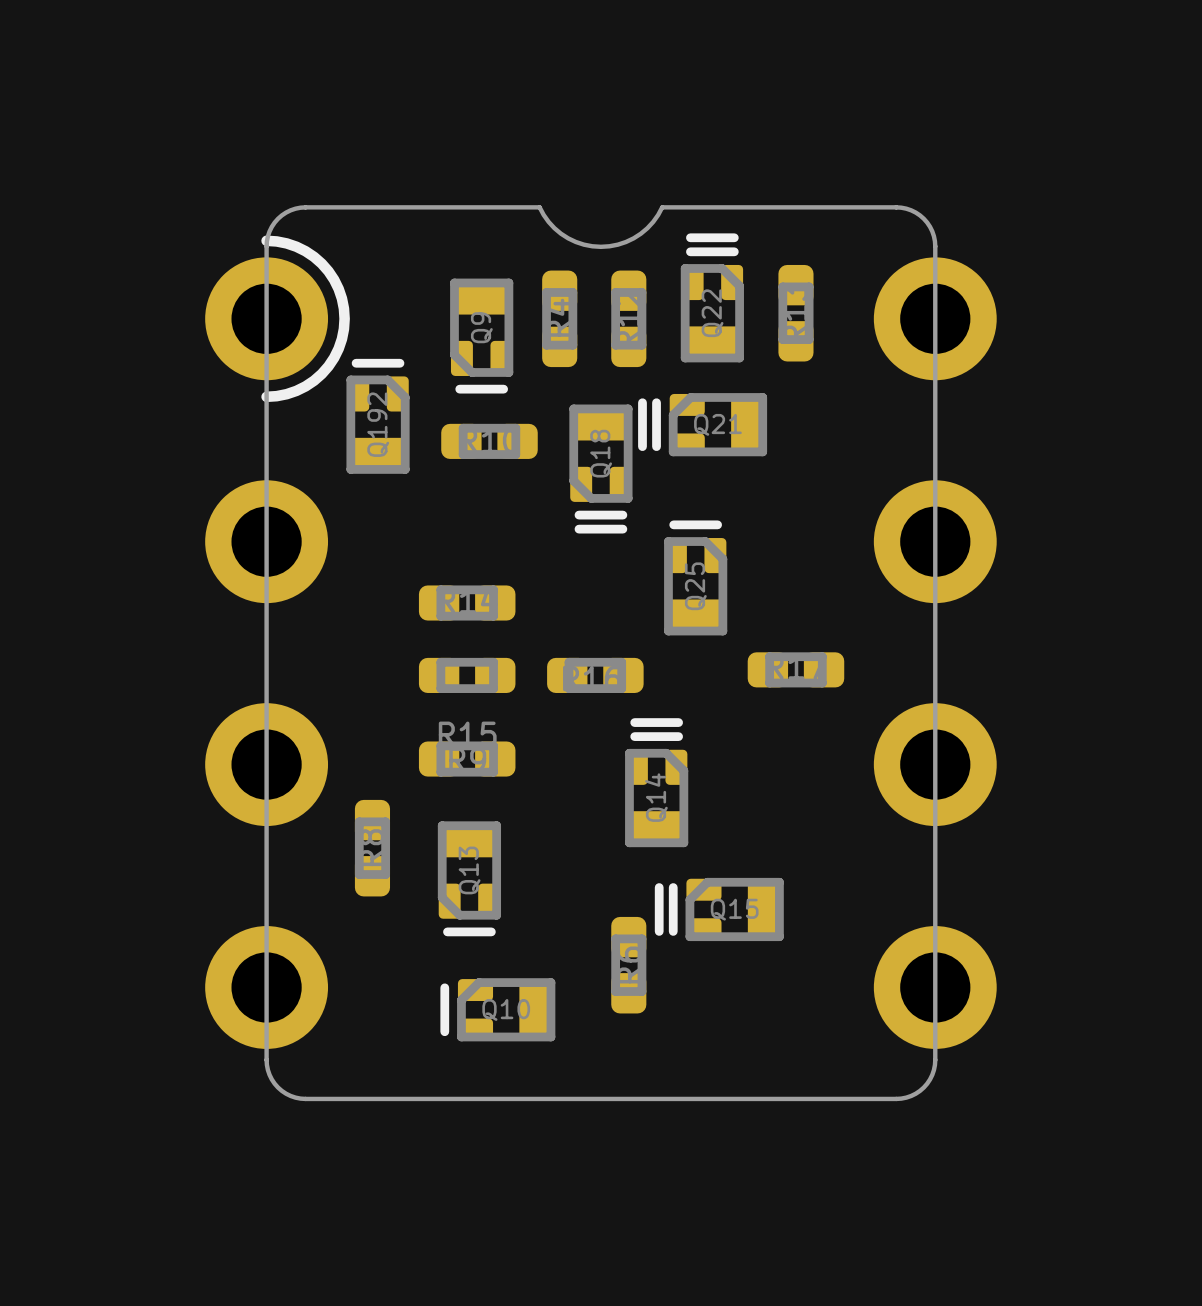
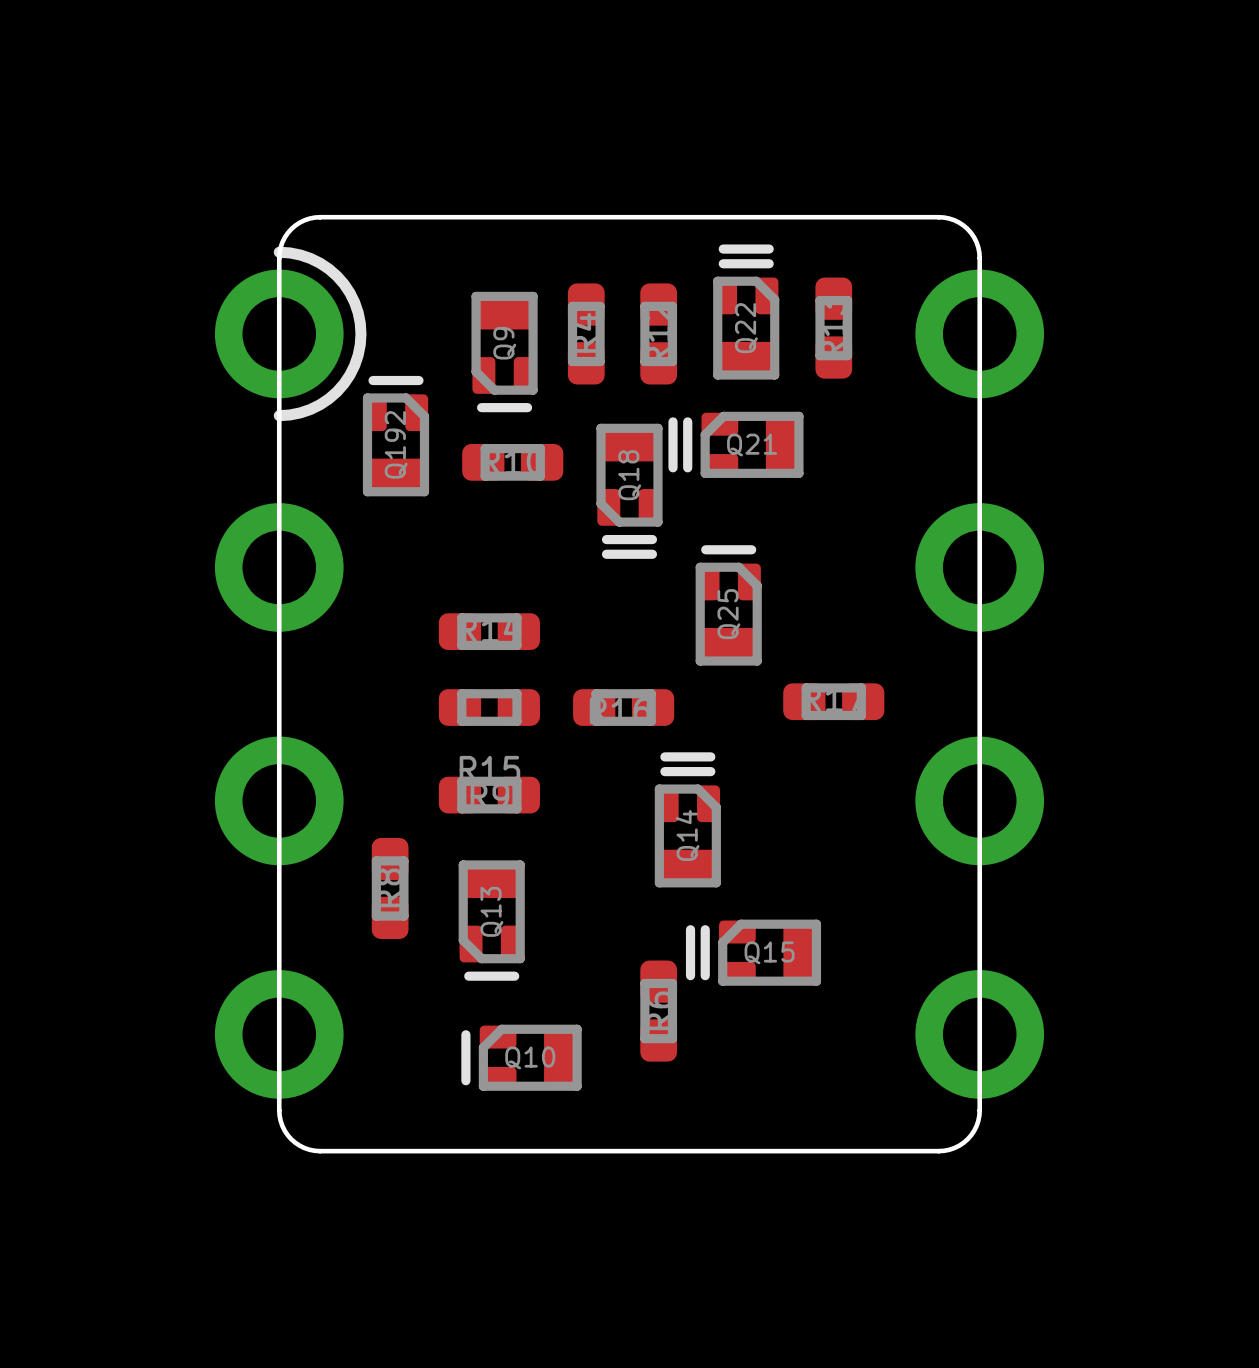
board edge: (539, 207) (548, 221) (560, 233) (583, 244) (600, 246) (617, 244) (640, 233) (653, 221) (662, 207) -> (565, 217) (693, 217)

